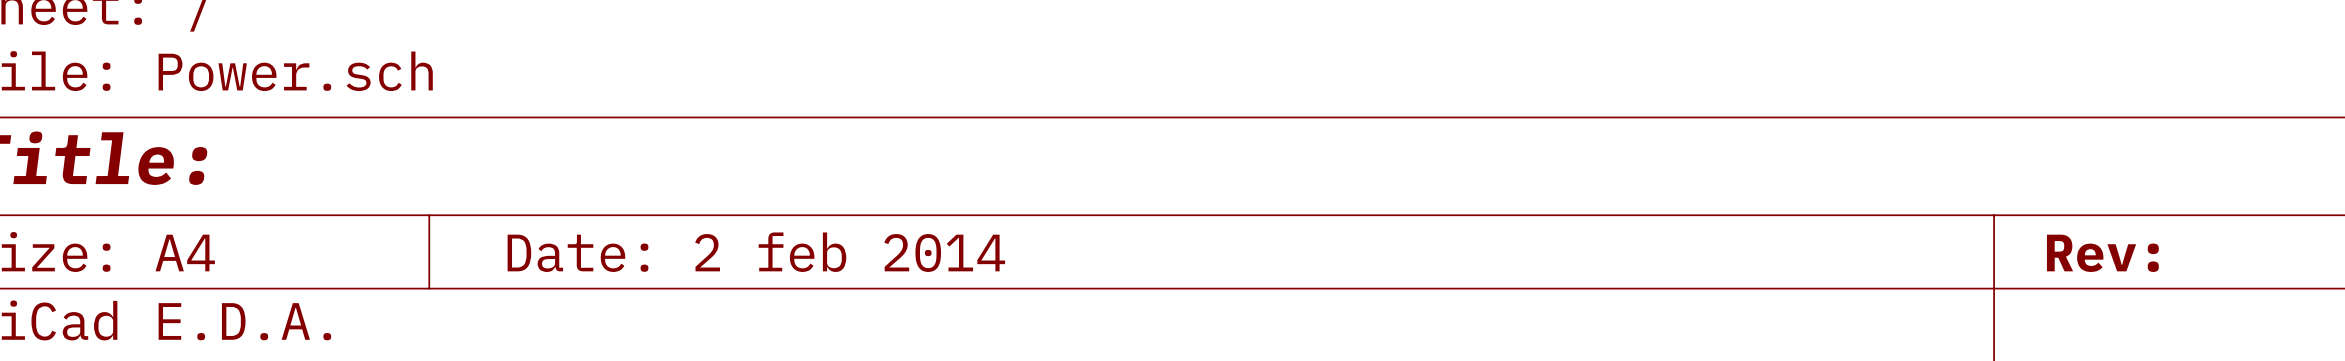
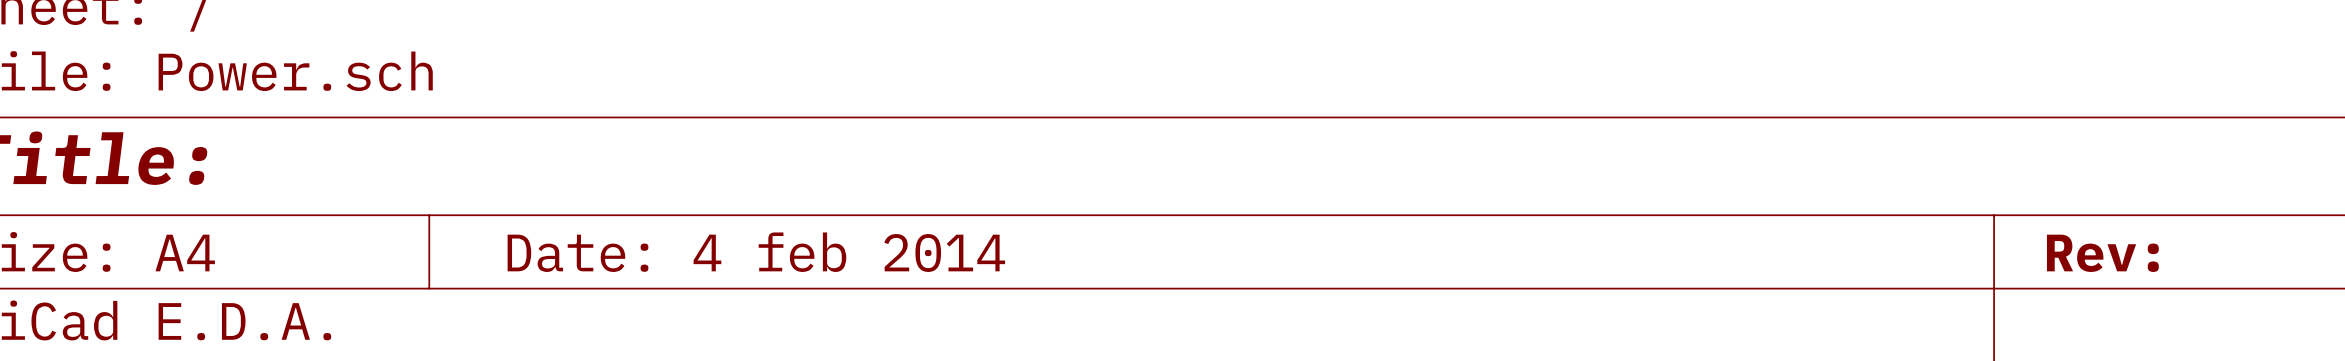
title block: Date: 2 feb 2014 (756, 252) -> Date: 4 feb 2014 (756, 252)

